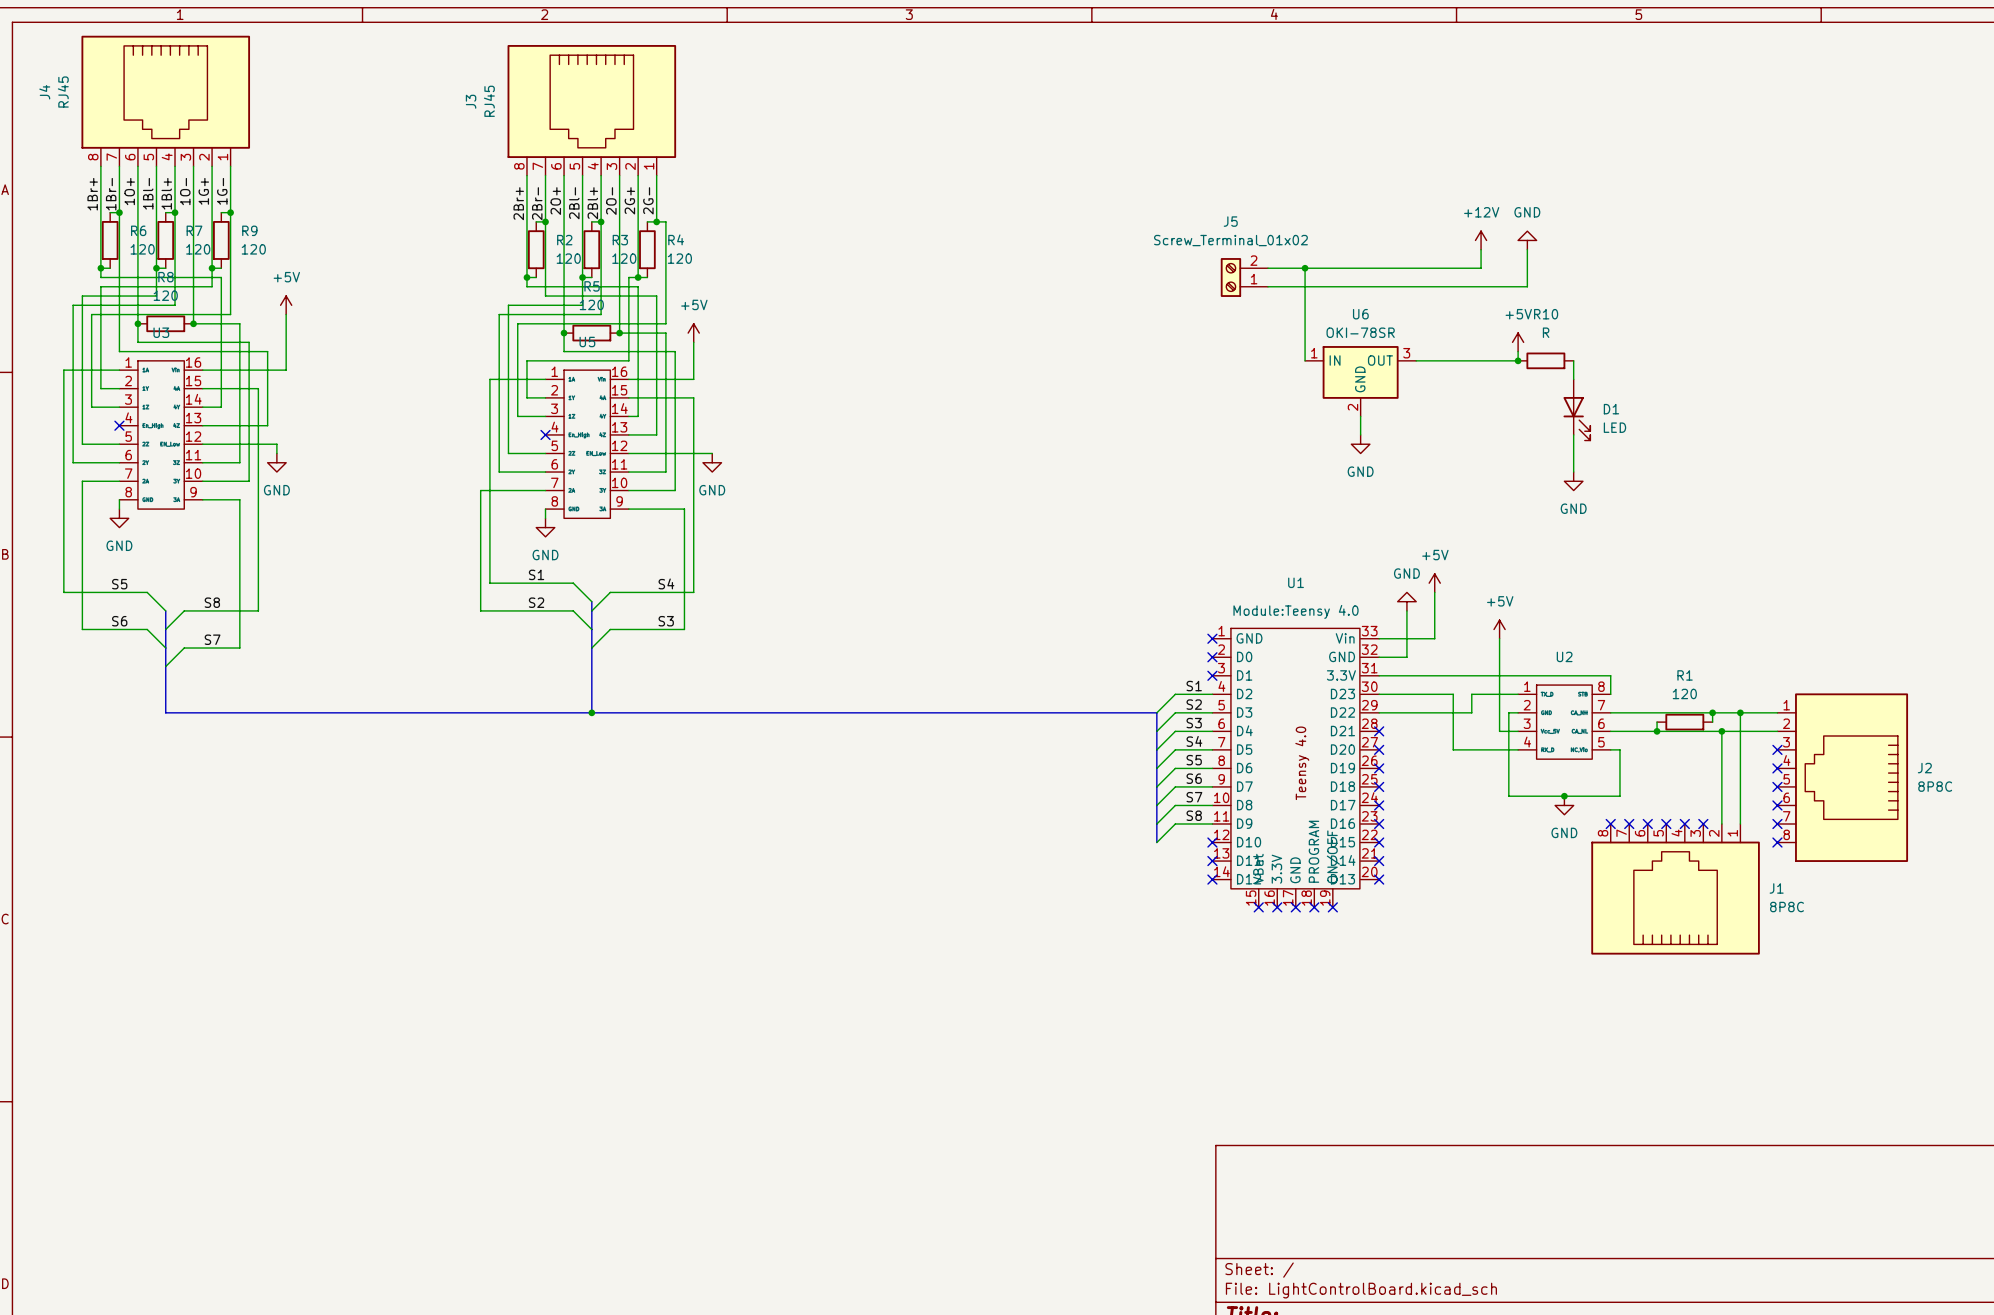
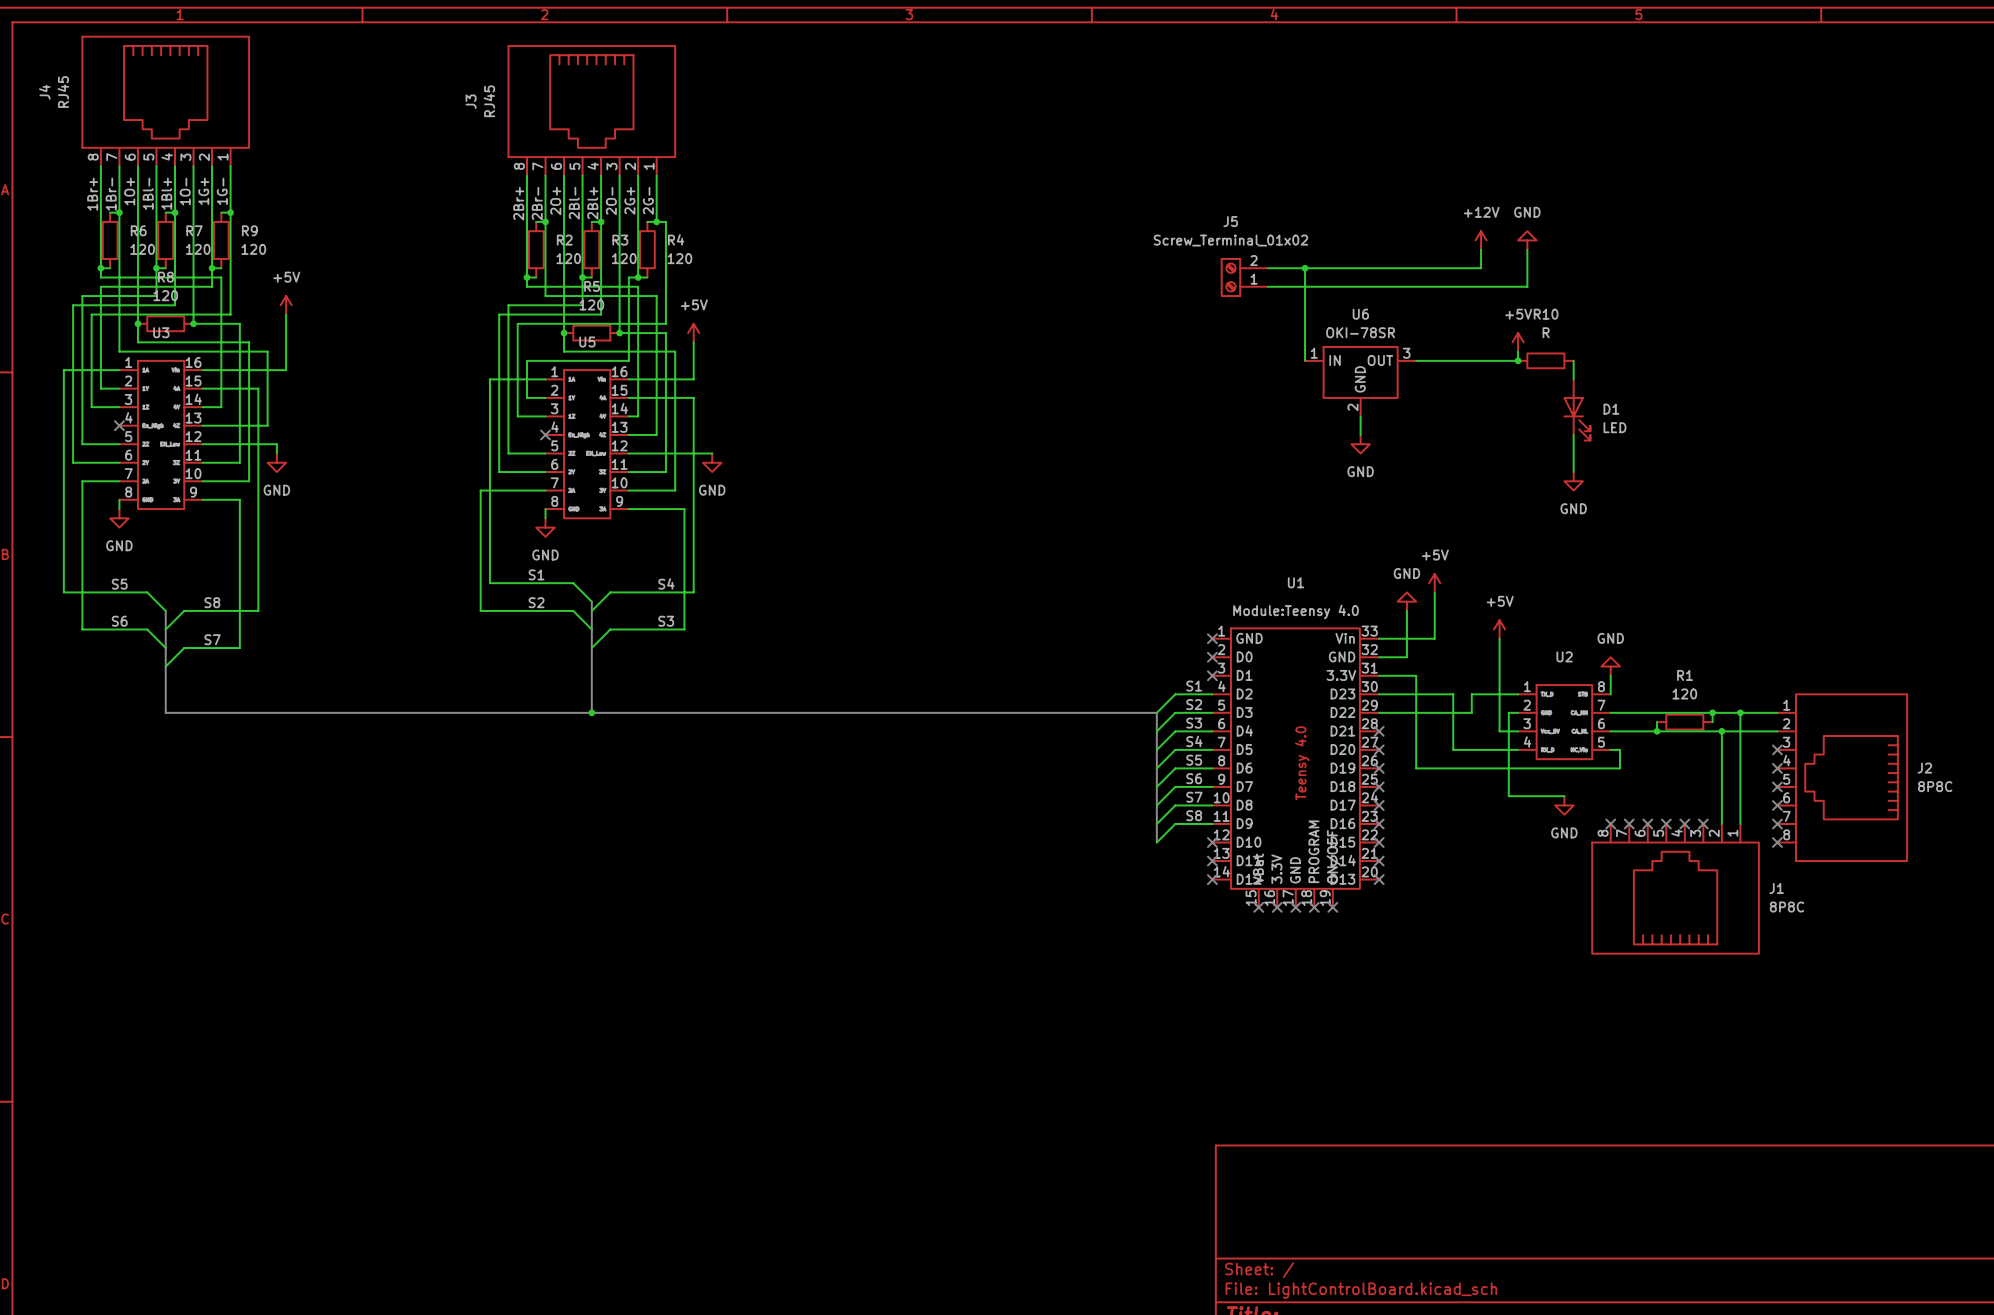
power symbol: none -> GND (1610, 666)
wire: (1416, 675) (1610, 675) -> (1416, 675) (1416, 768) (1619, 768)
wire: (1619, 768) (1619, 796) (1564, 796) -> none
junction: (1564, 796) -> none

